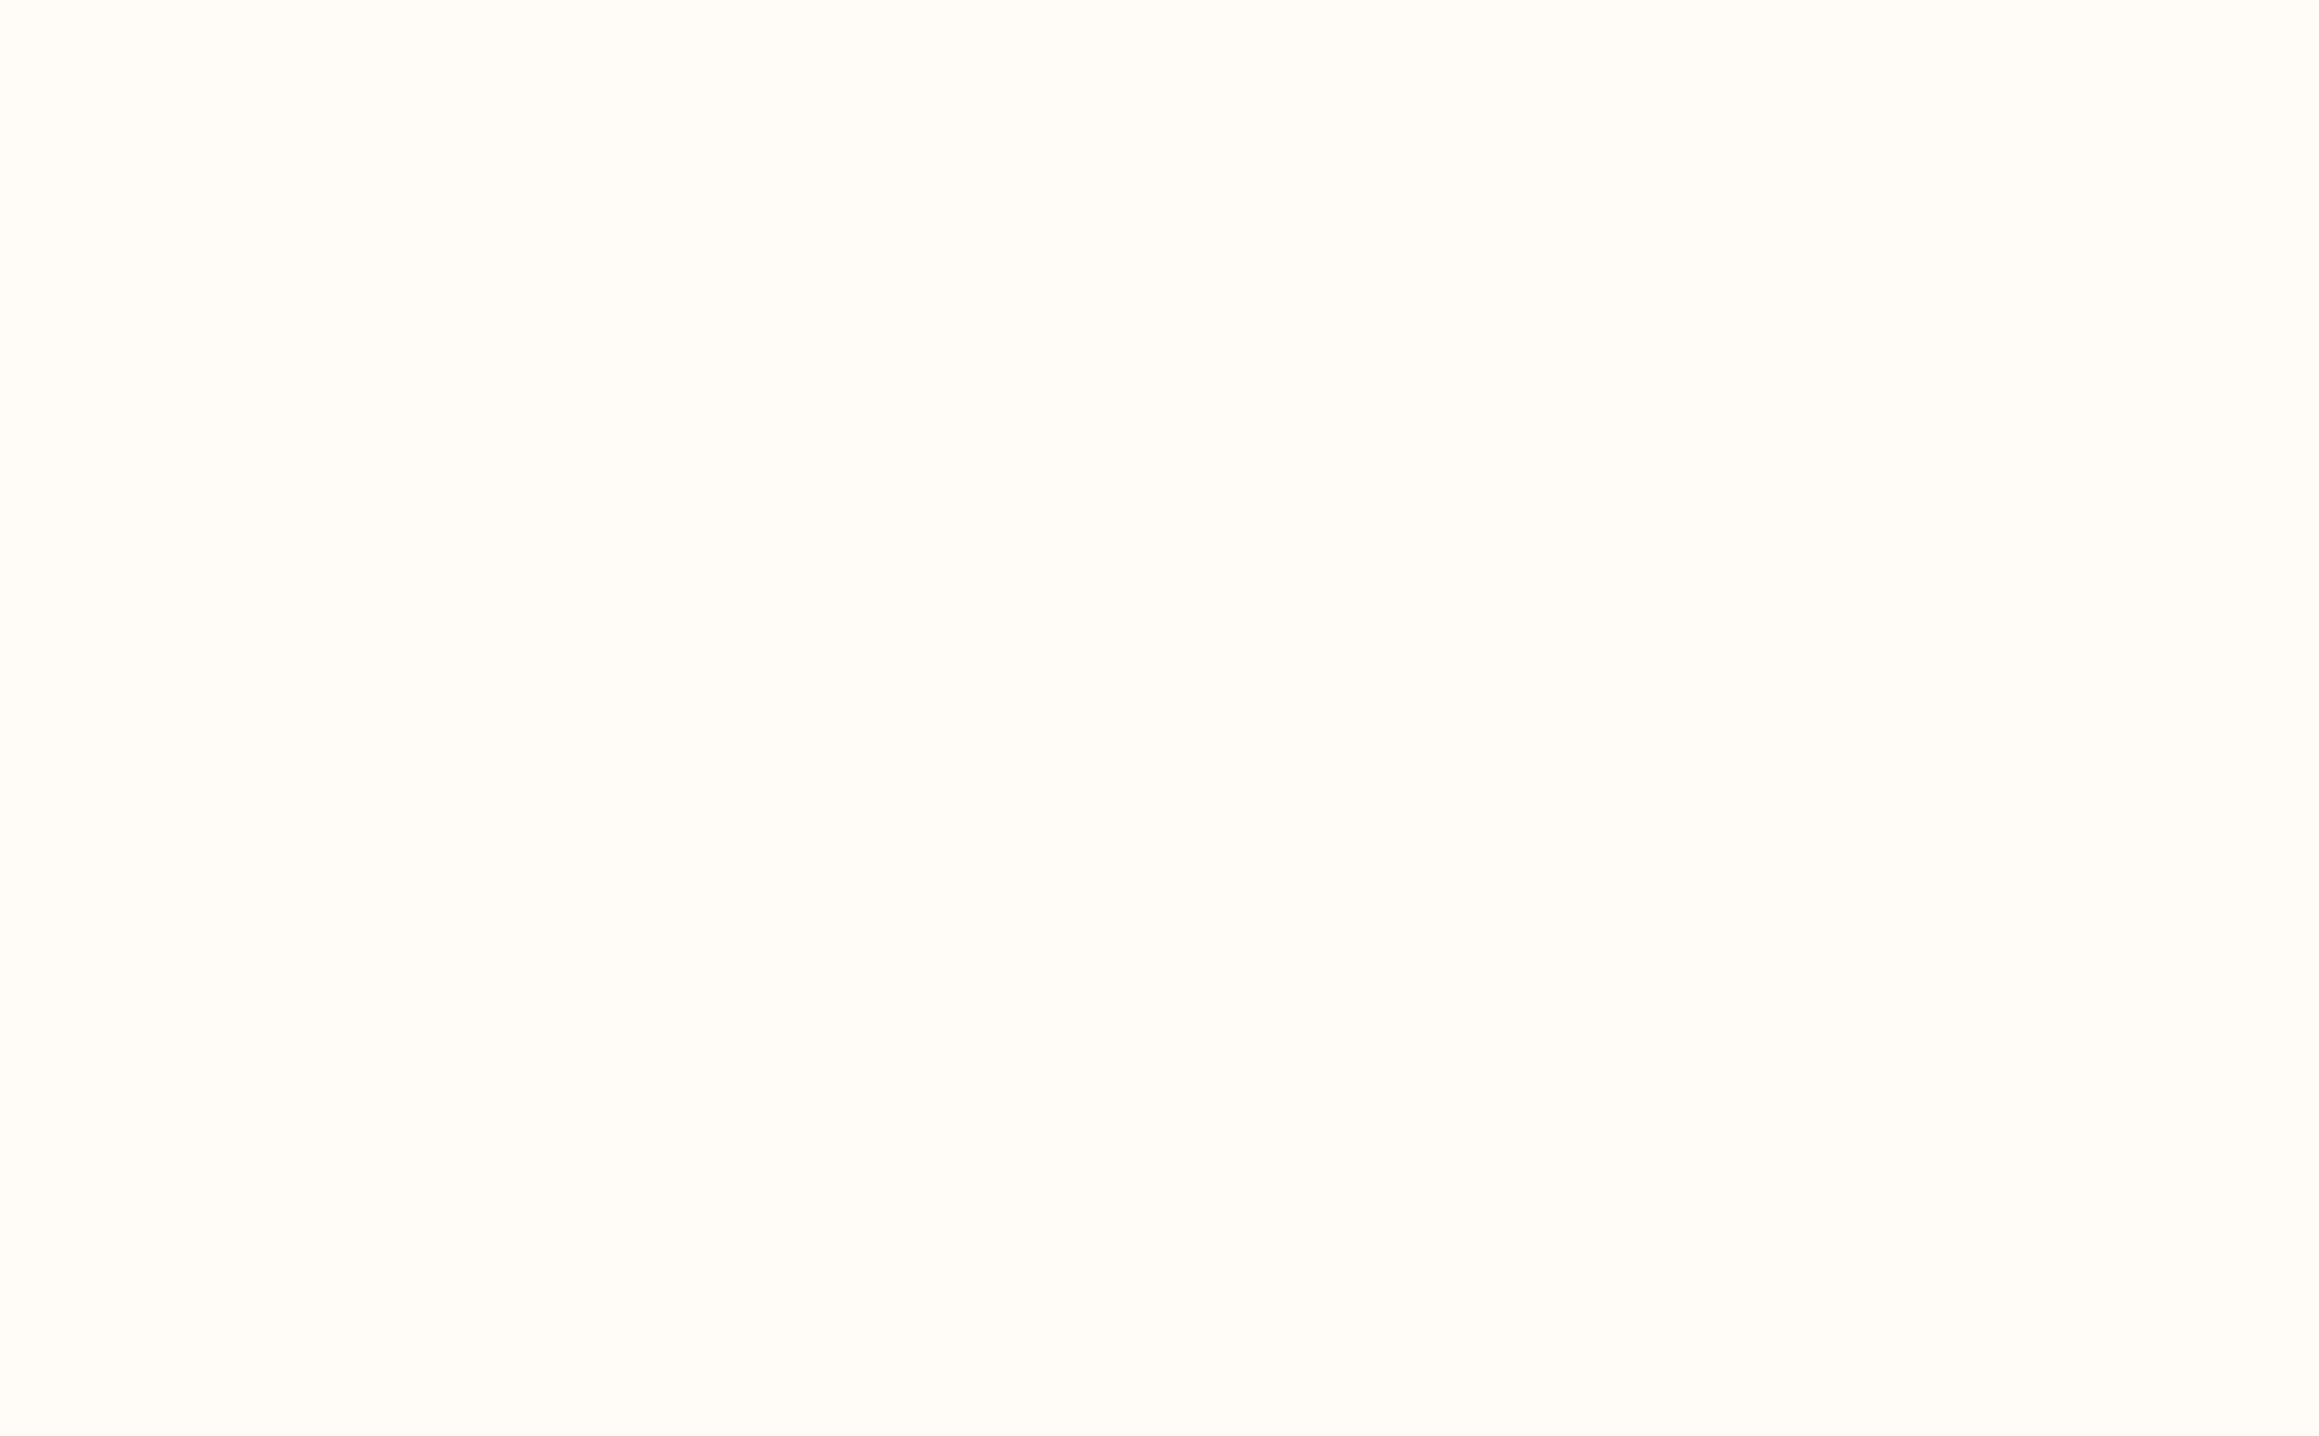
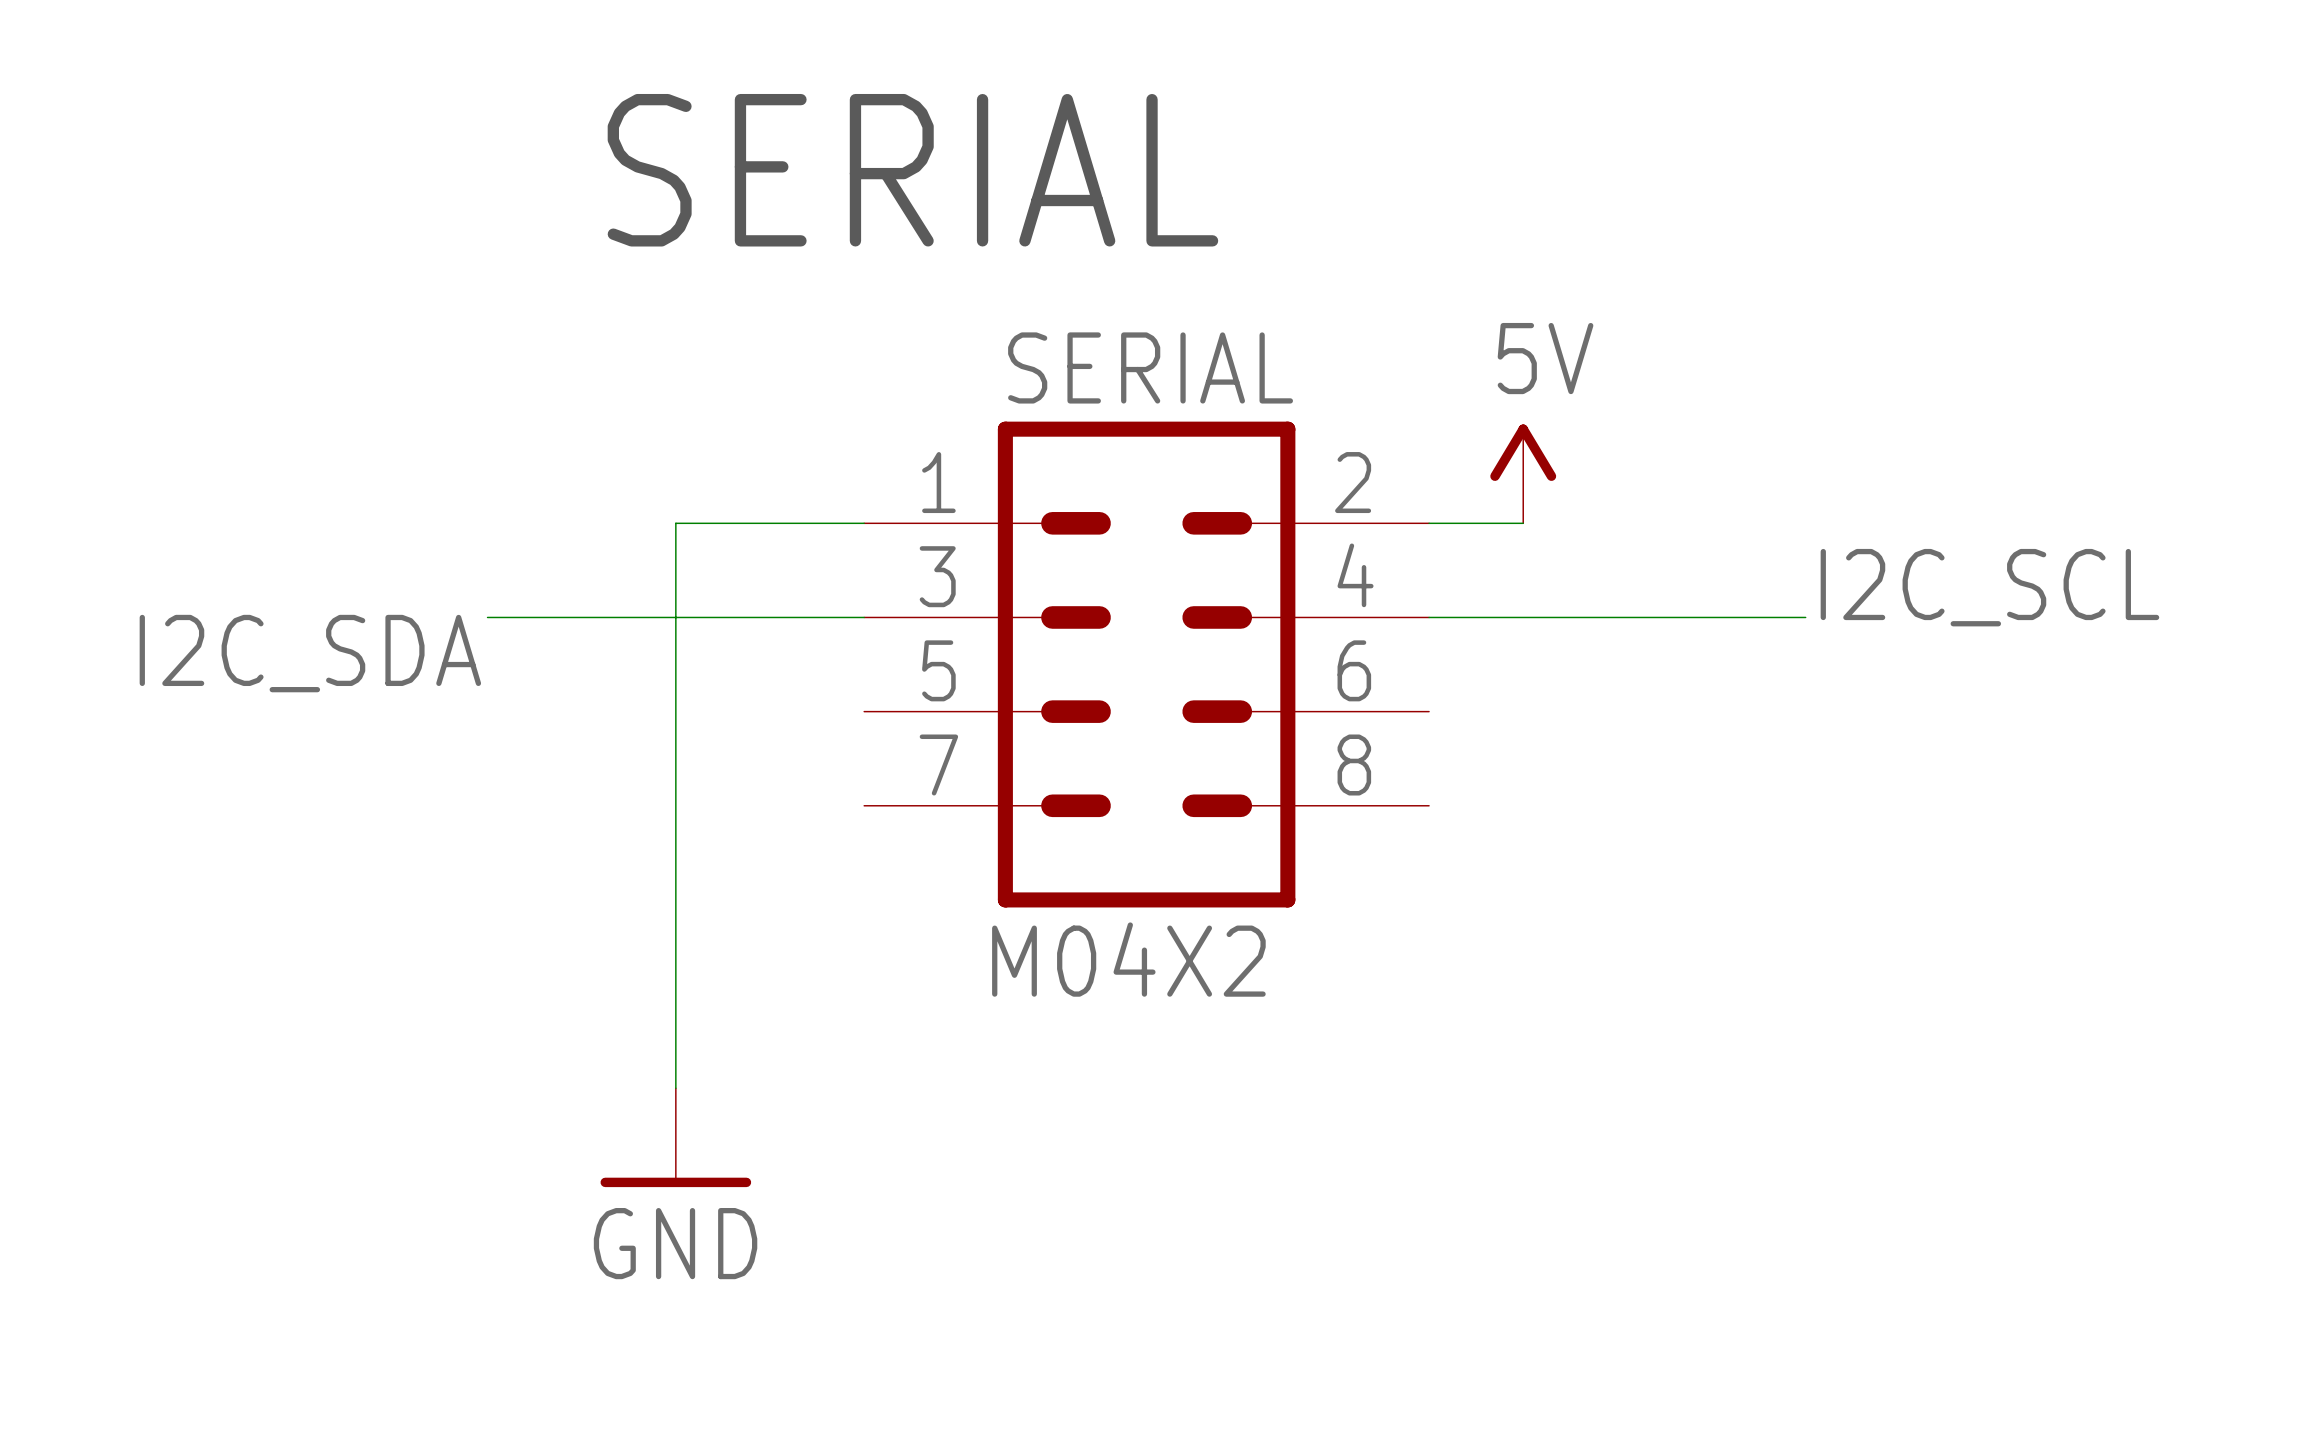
text: none -> SERIAL (912, 170)
power symbol: none -> 5V (1523, 473)
wire: none -> (864, 523) (675, 523) (675, 1088)
wire: none -> (1429, 523) (1523, 523)
label: none -> I2C_SCL (1989, 587)
wire: none -> (487, 617) (864, 617)
wire: none -> (1429, 617) (1805, 617)
label: none -> I2C_SDA (310, 653)
SERIAL: none -> M04X2 (1146, 664)
power symbol: none -> GND (675, 1137)

